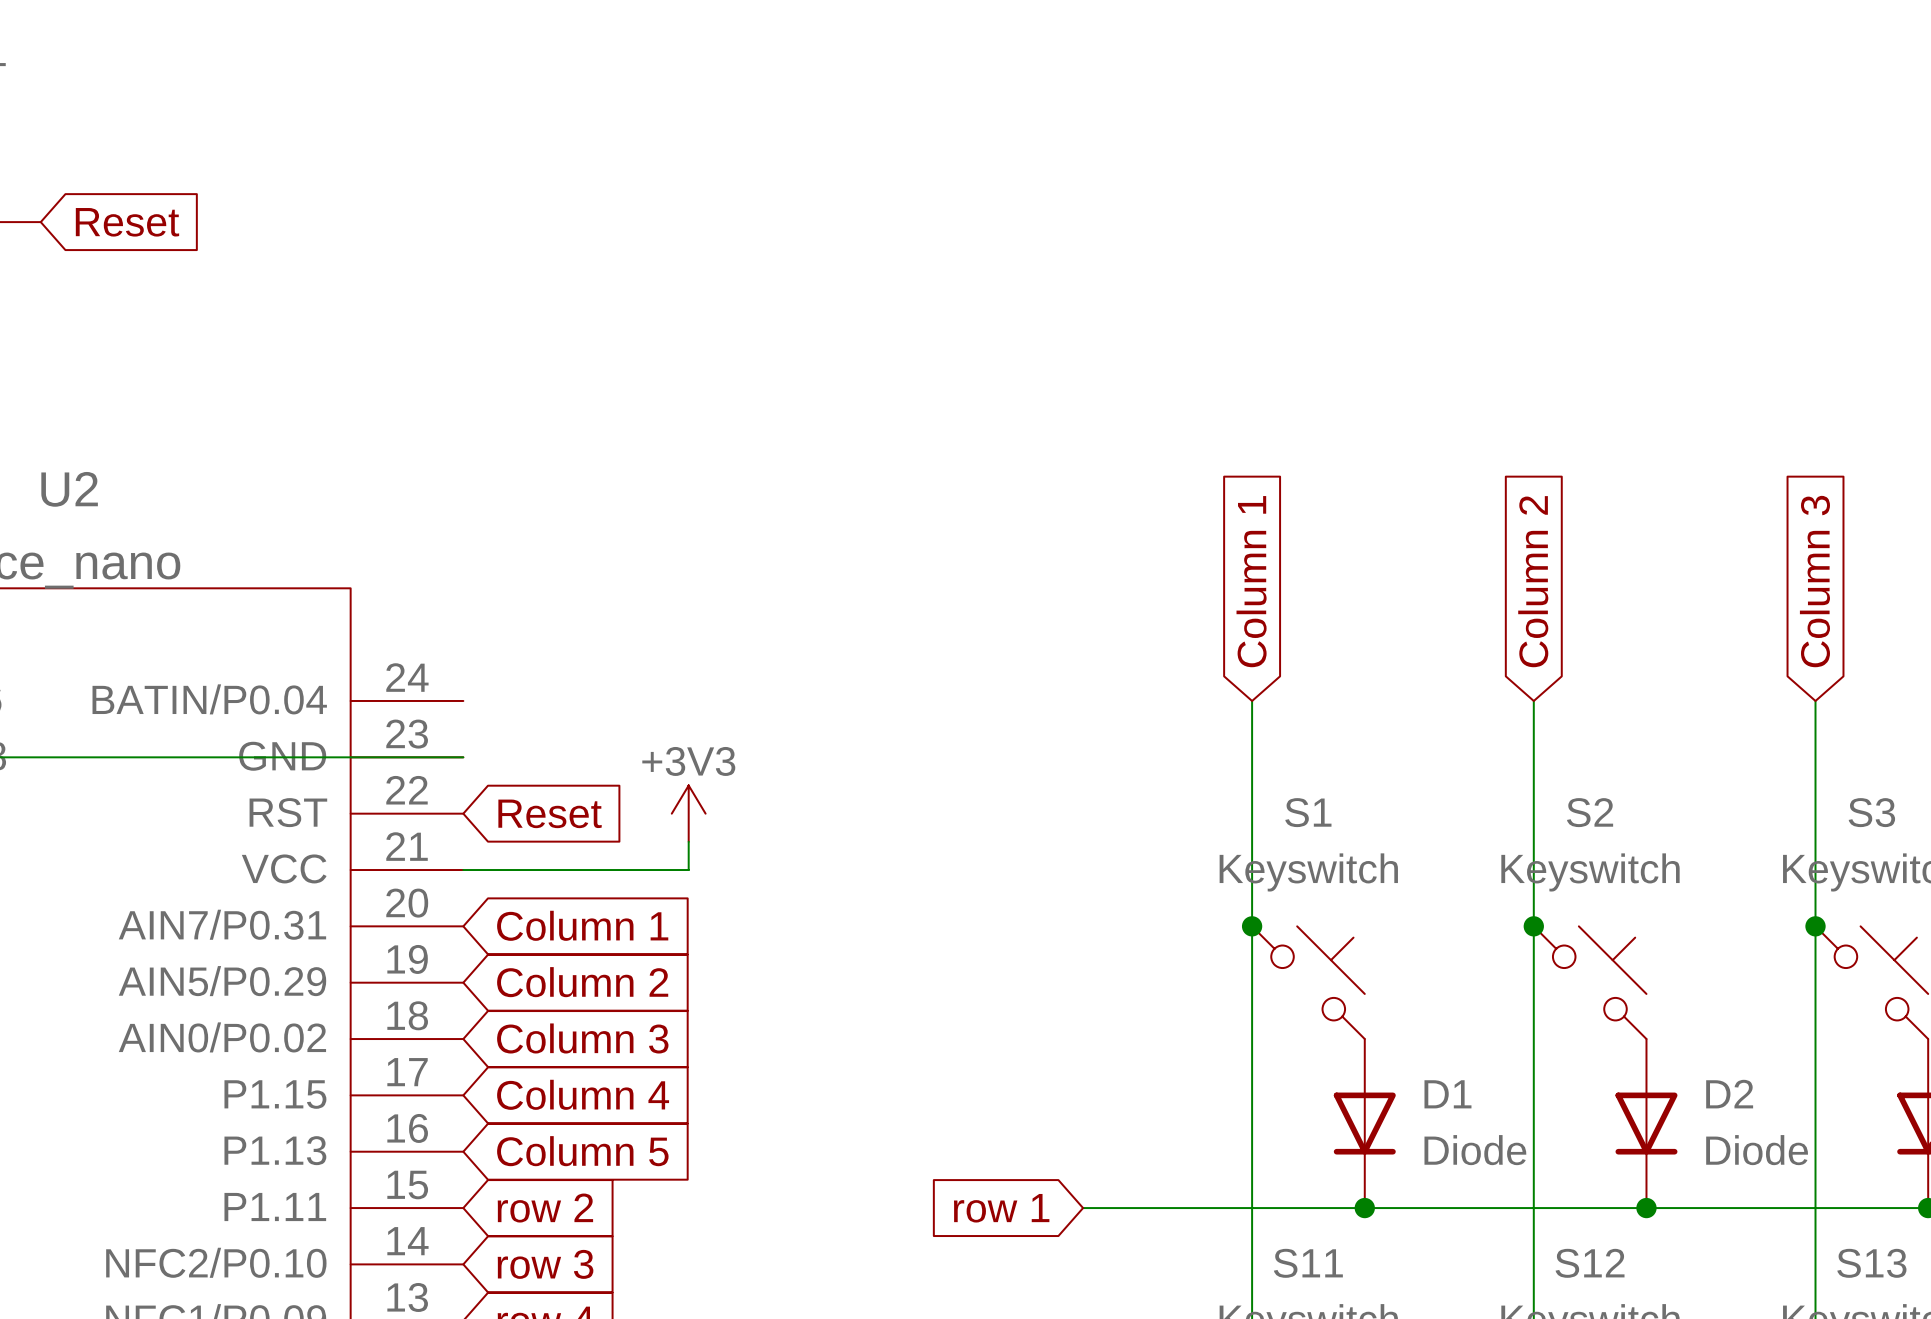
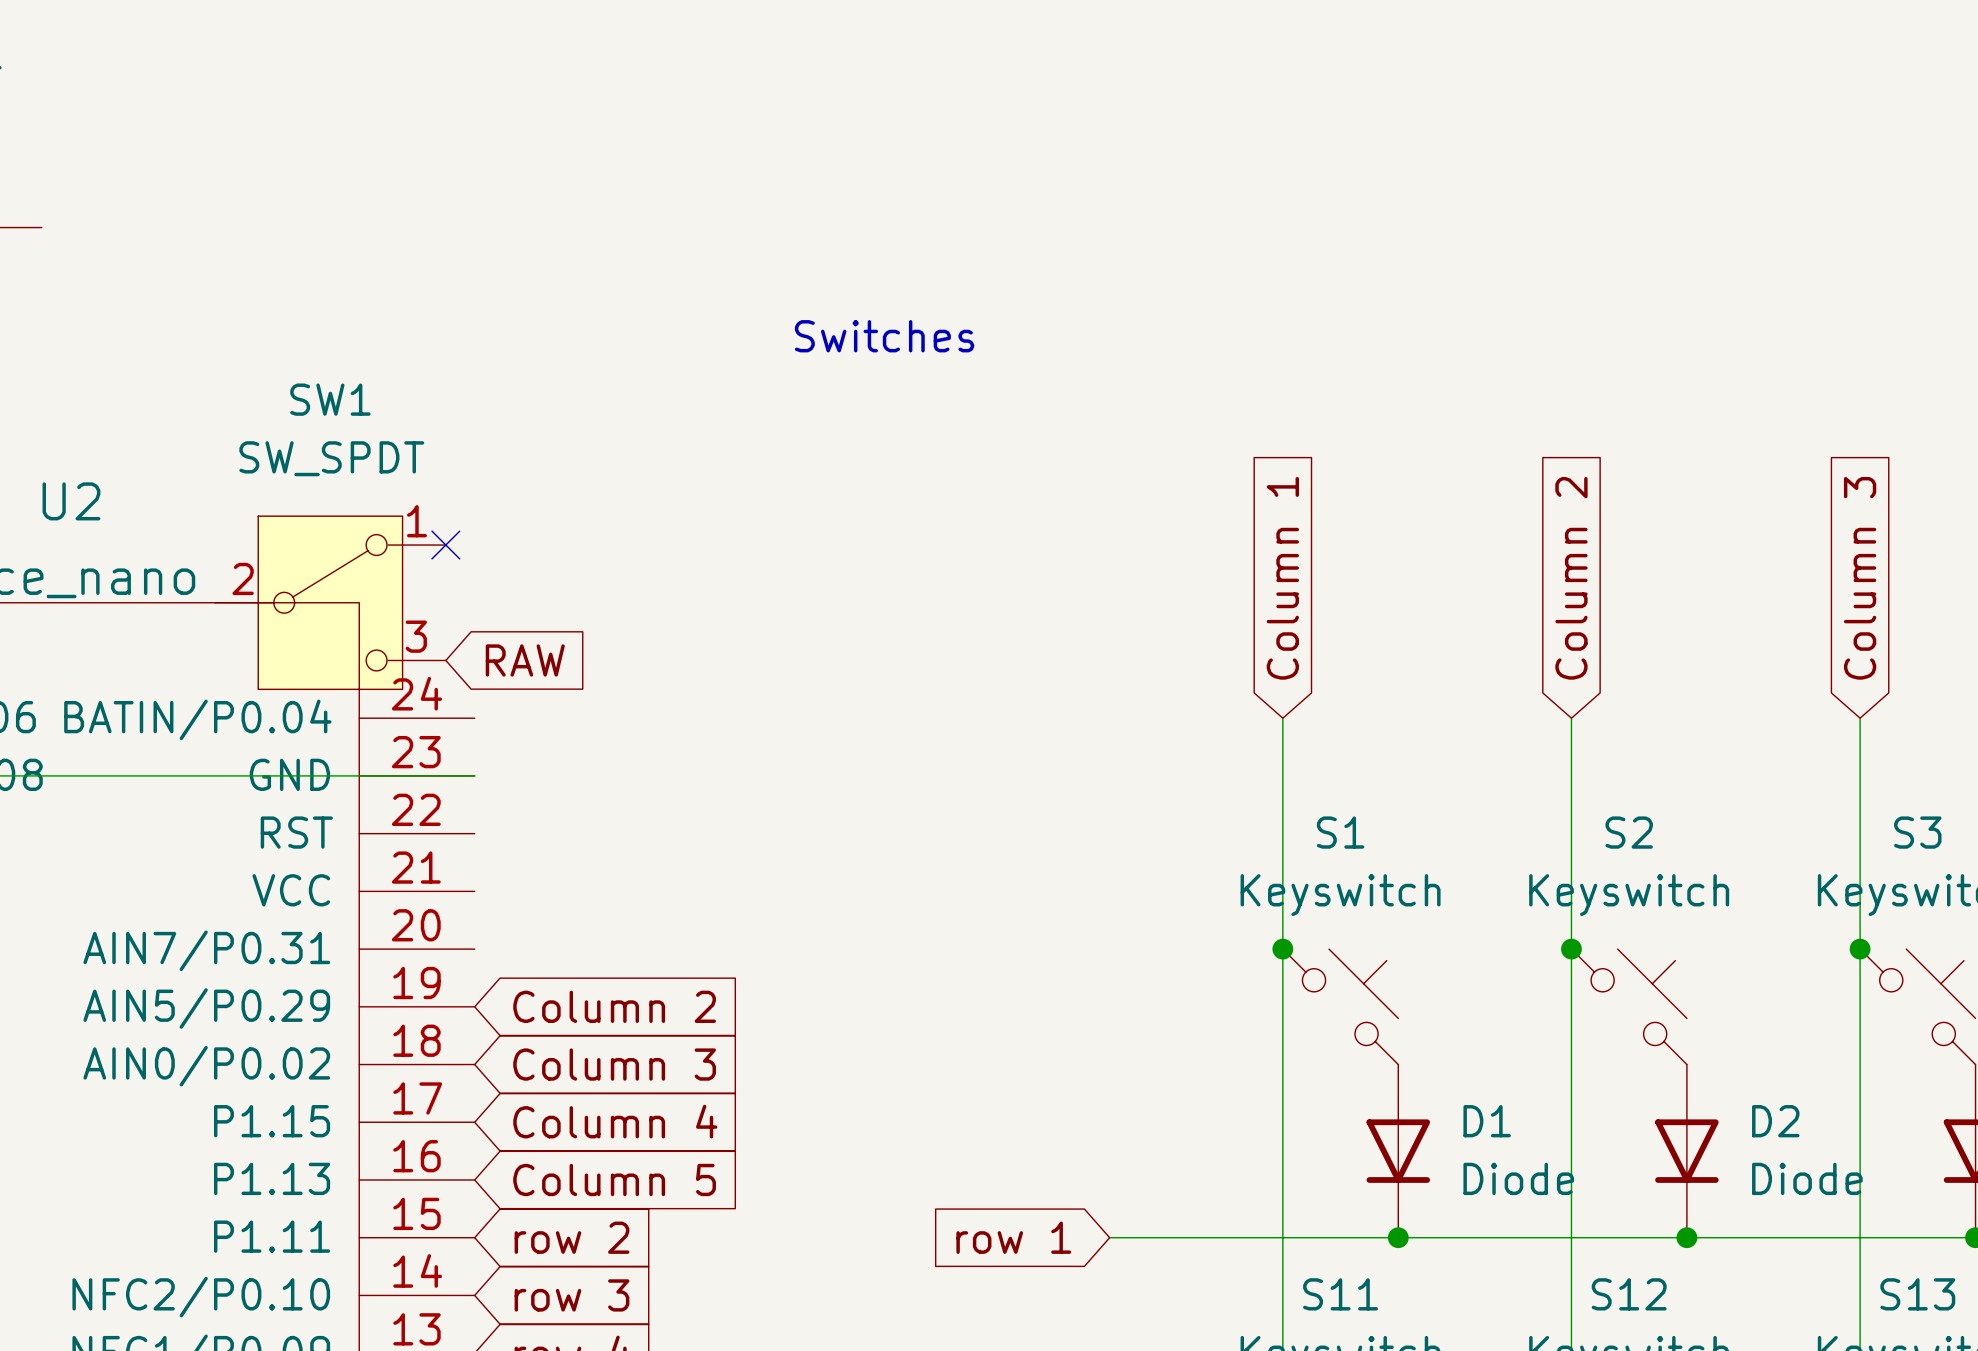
global label: Reset (127, 222) -> none
text: none -> Switches (884, 336)
no-connect mark: none -> (445, 545)
SW1: none -> SW_SPDT (330, 602)
global label: none -> RAW (525, 660)
global label: Reset (550, 813) -> none
power symbol: +3V3 (688, 813) -> none
wire: (688, 841) (688, 870) (463, 870) -> none
global label: Column 1 (582, 925) -> none

